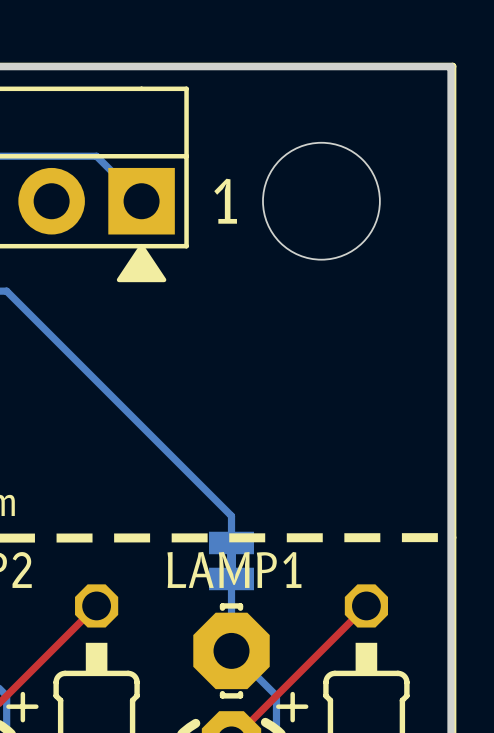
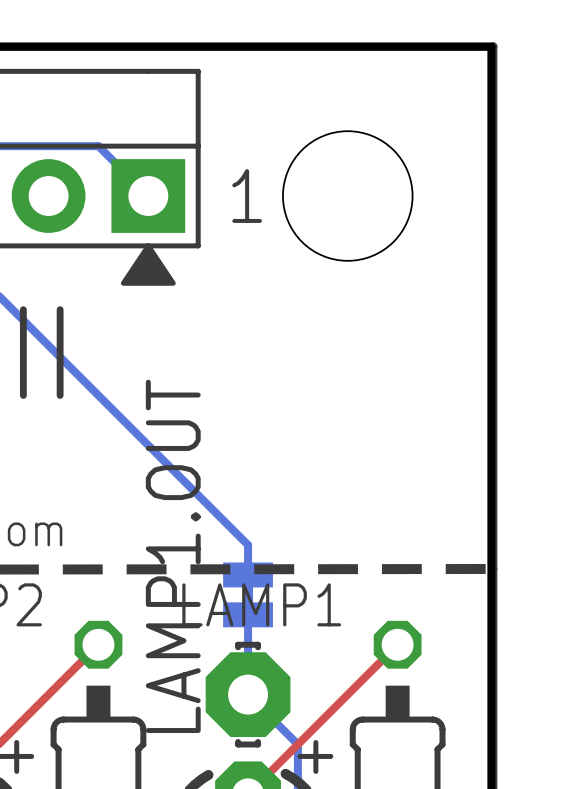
LAMP1.OUT name: none -> LAMP1.OUT (173, 556)

